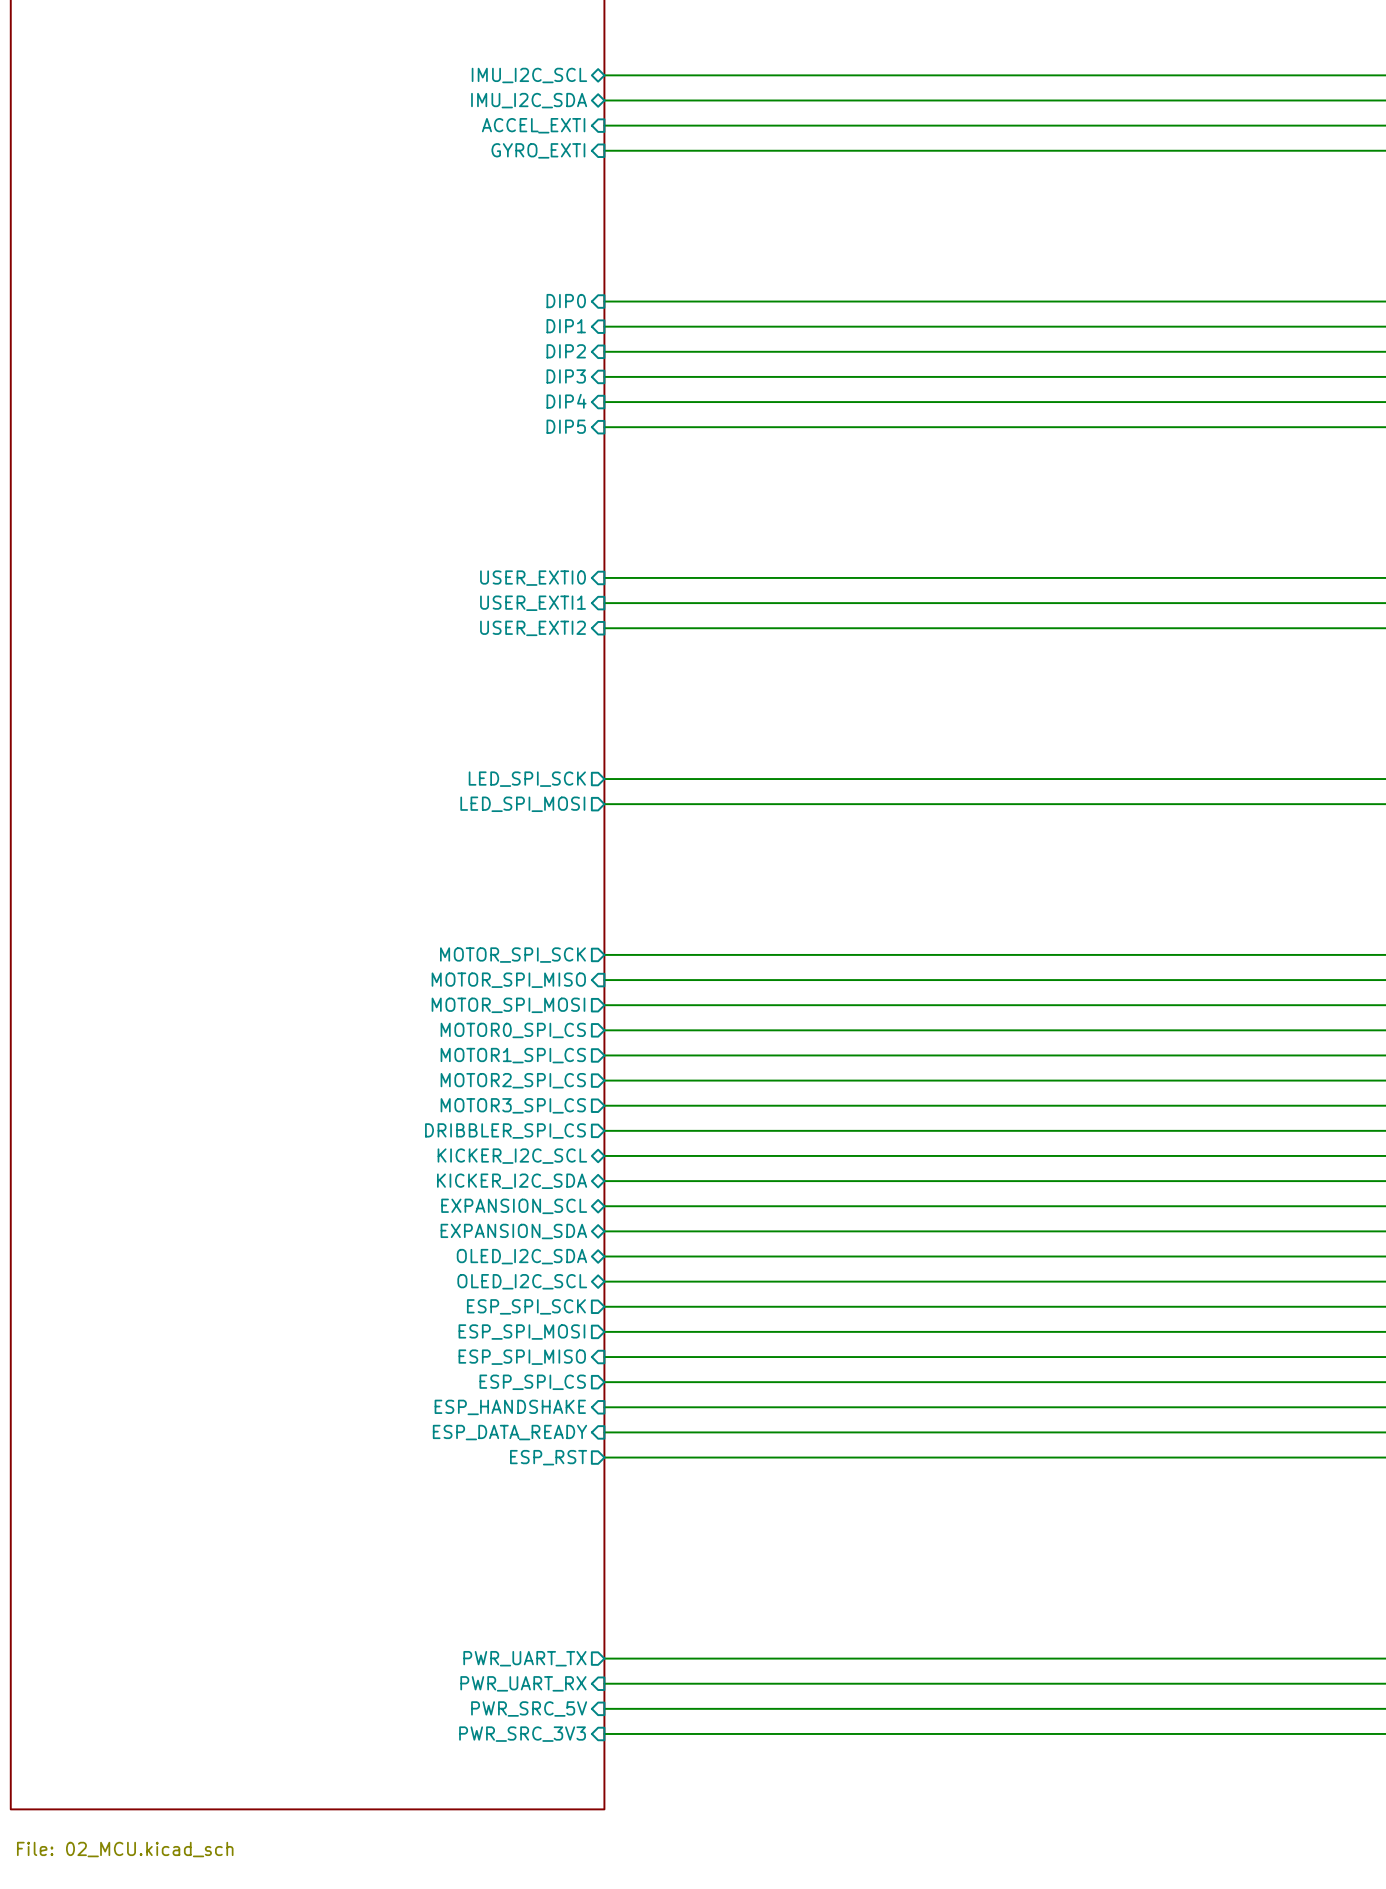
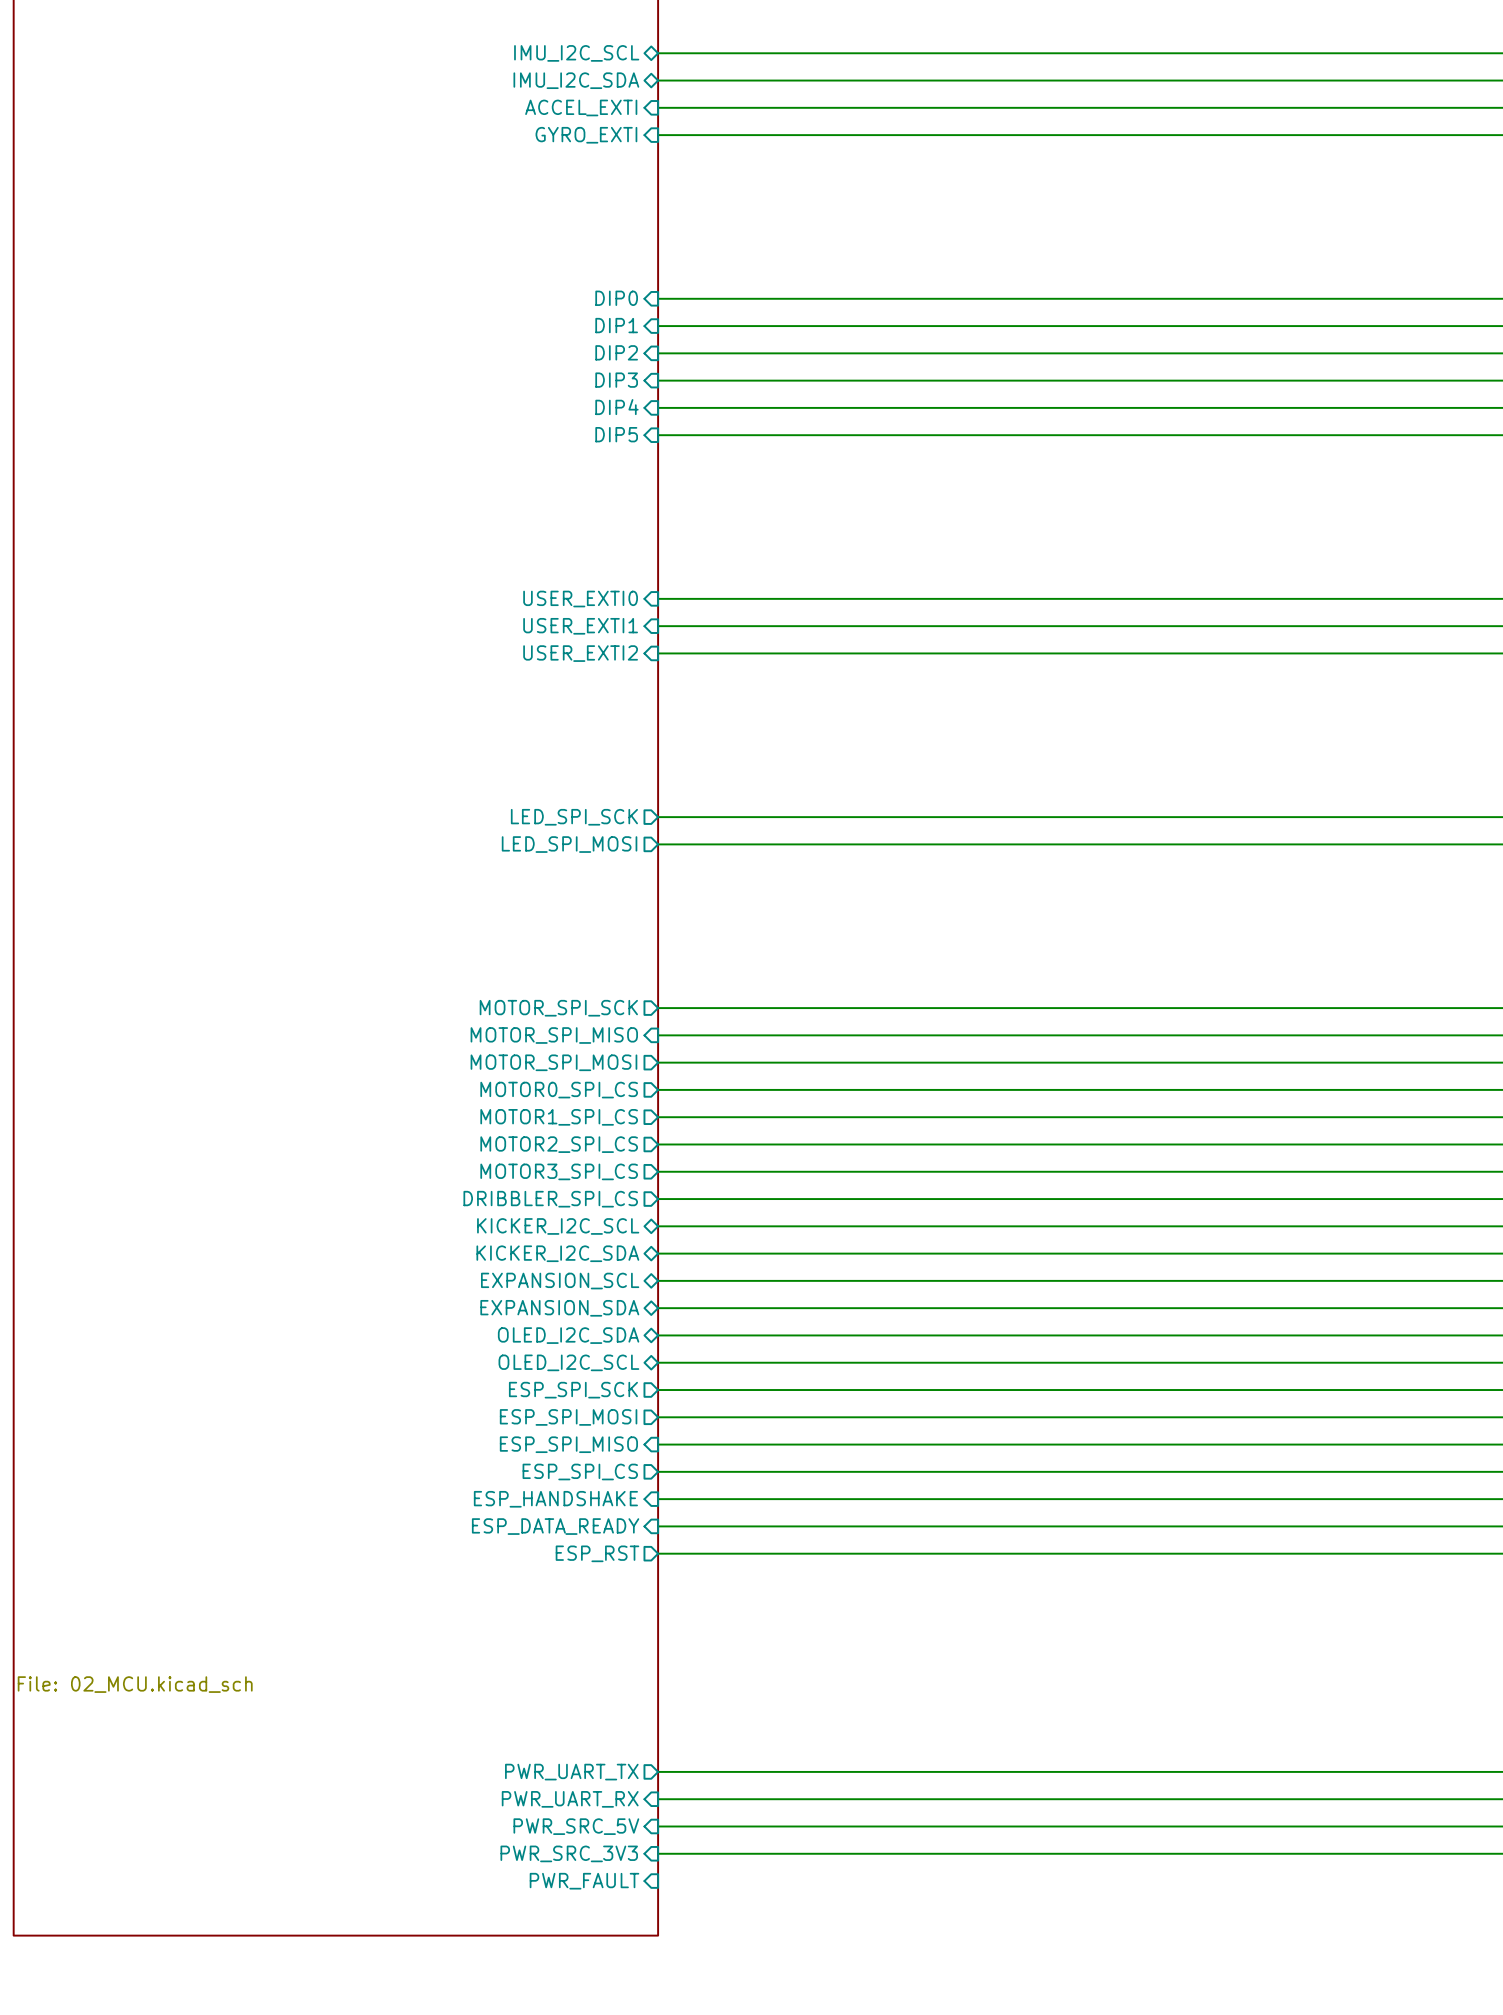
sheet pin: none -> PWR_FAULT (584, 1881)
sheet value position: File: 02_MCU.kicad_sch (125, 1849) -> File: 02_MCU.kicad_sch (135, 1684)

